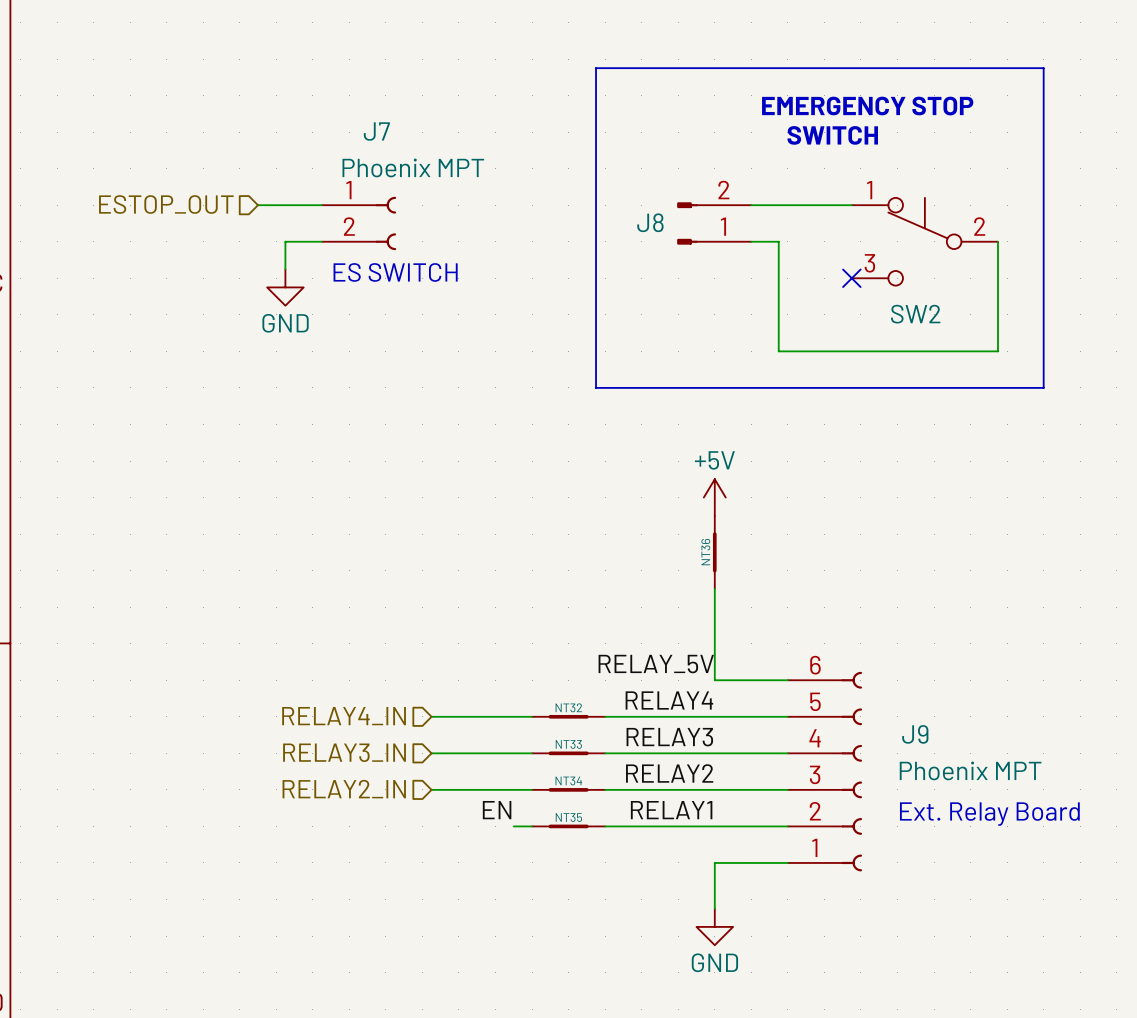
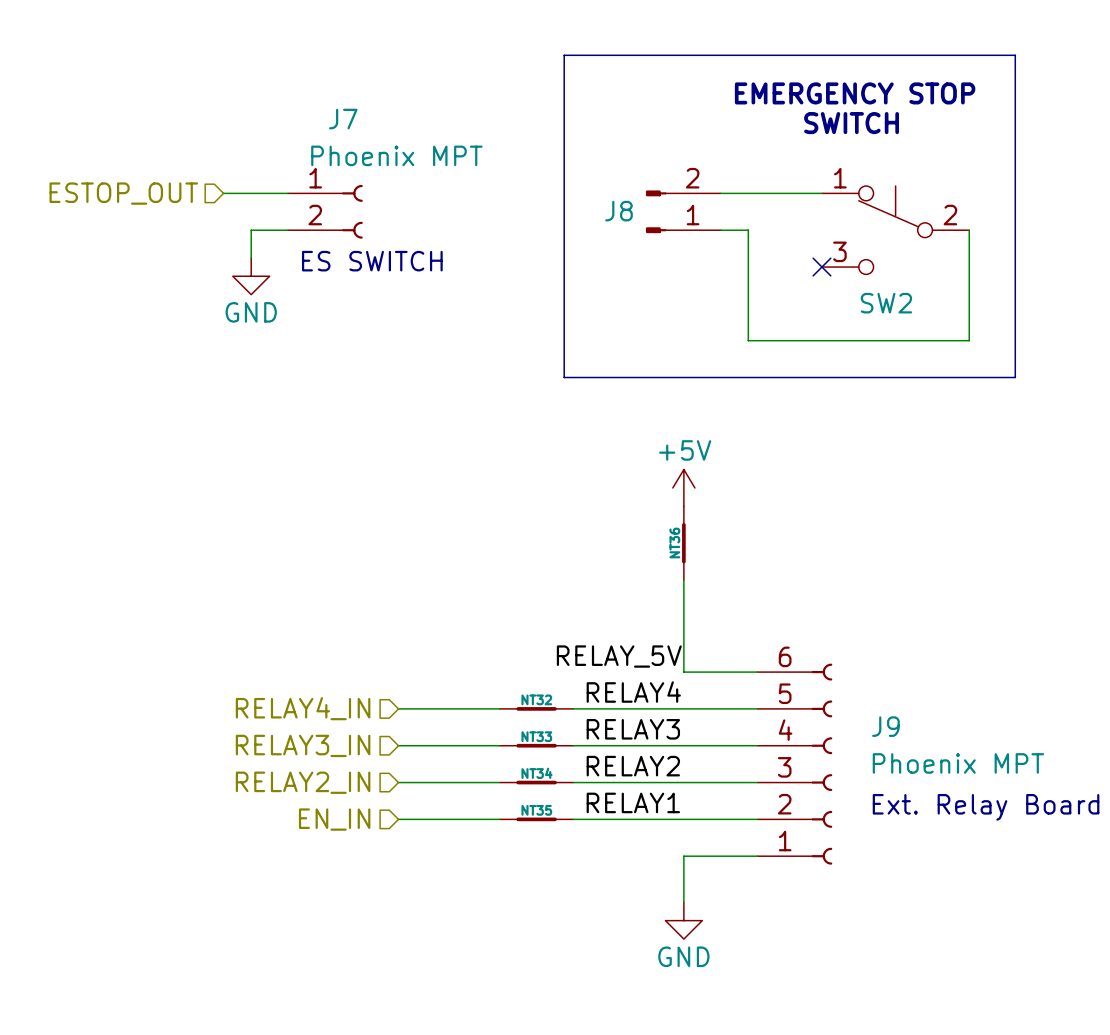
label: EN (497, 810) -> none
hierarchical label: none -> EN_IN (334, 819)
wire: none -> (398, 819) (481, 819)

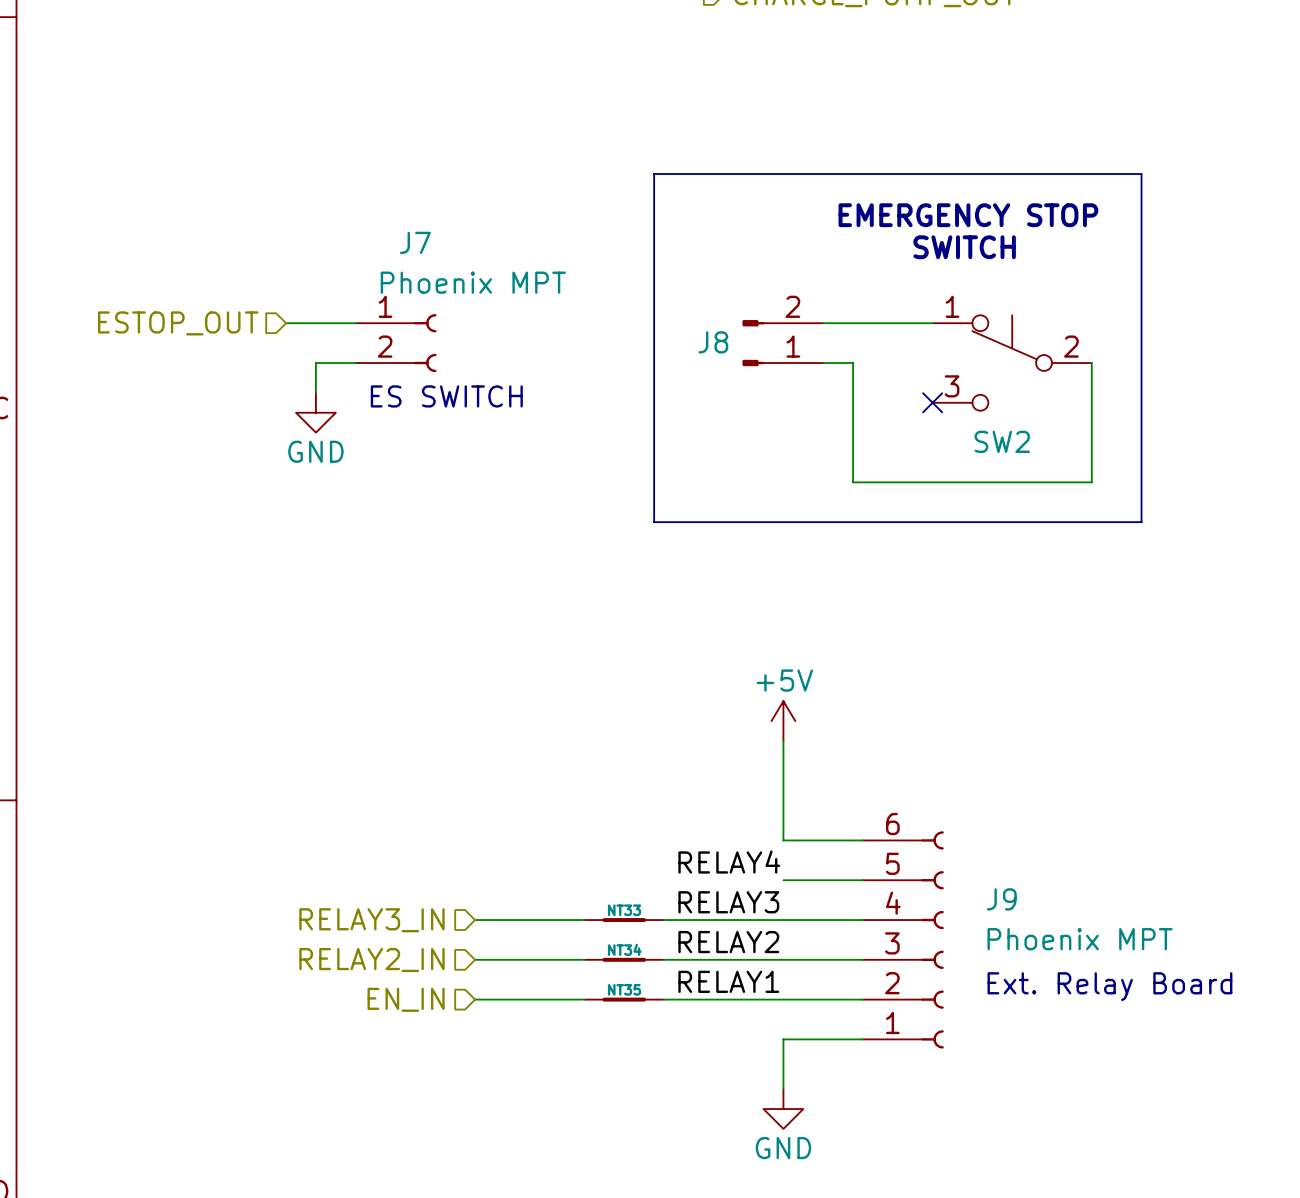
power symbol position: +5V (683, 487) -> +5V (783, 721)
NT36: (683, 543) -> none
label: RELAY_5V (619, 656) -> none
hierarchical label: RELAY4_IN (303, 708) -> none
wire: (398, 708) (499, 708) -> none
NT32: (536, 708) -> none
wire: (573, 708) (683, 708) -> none

